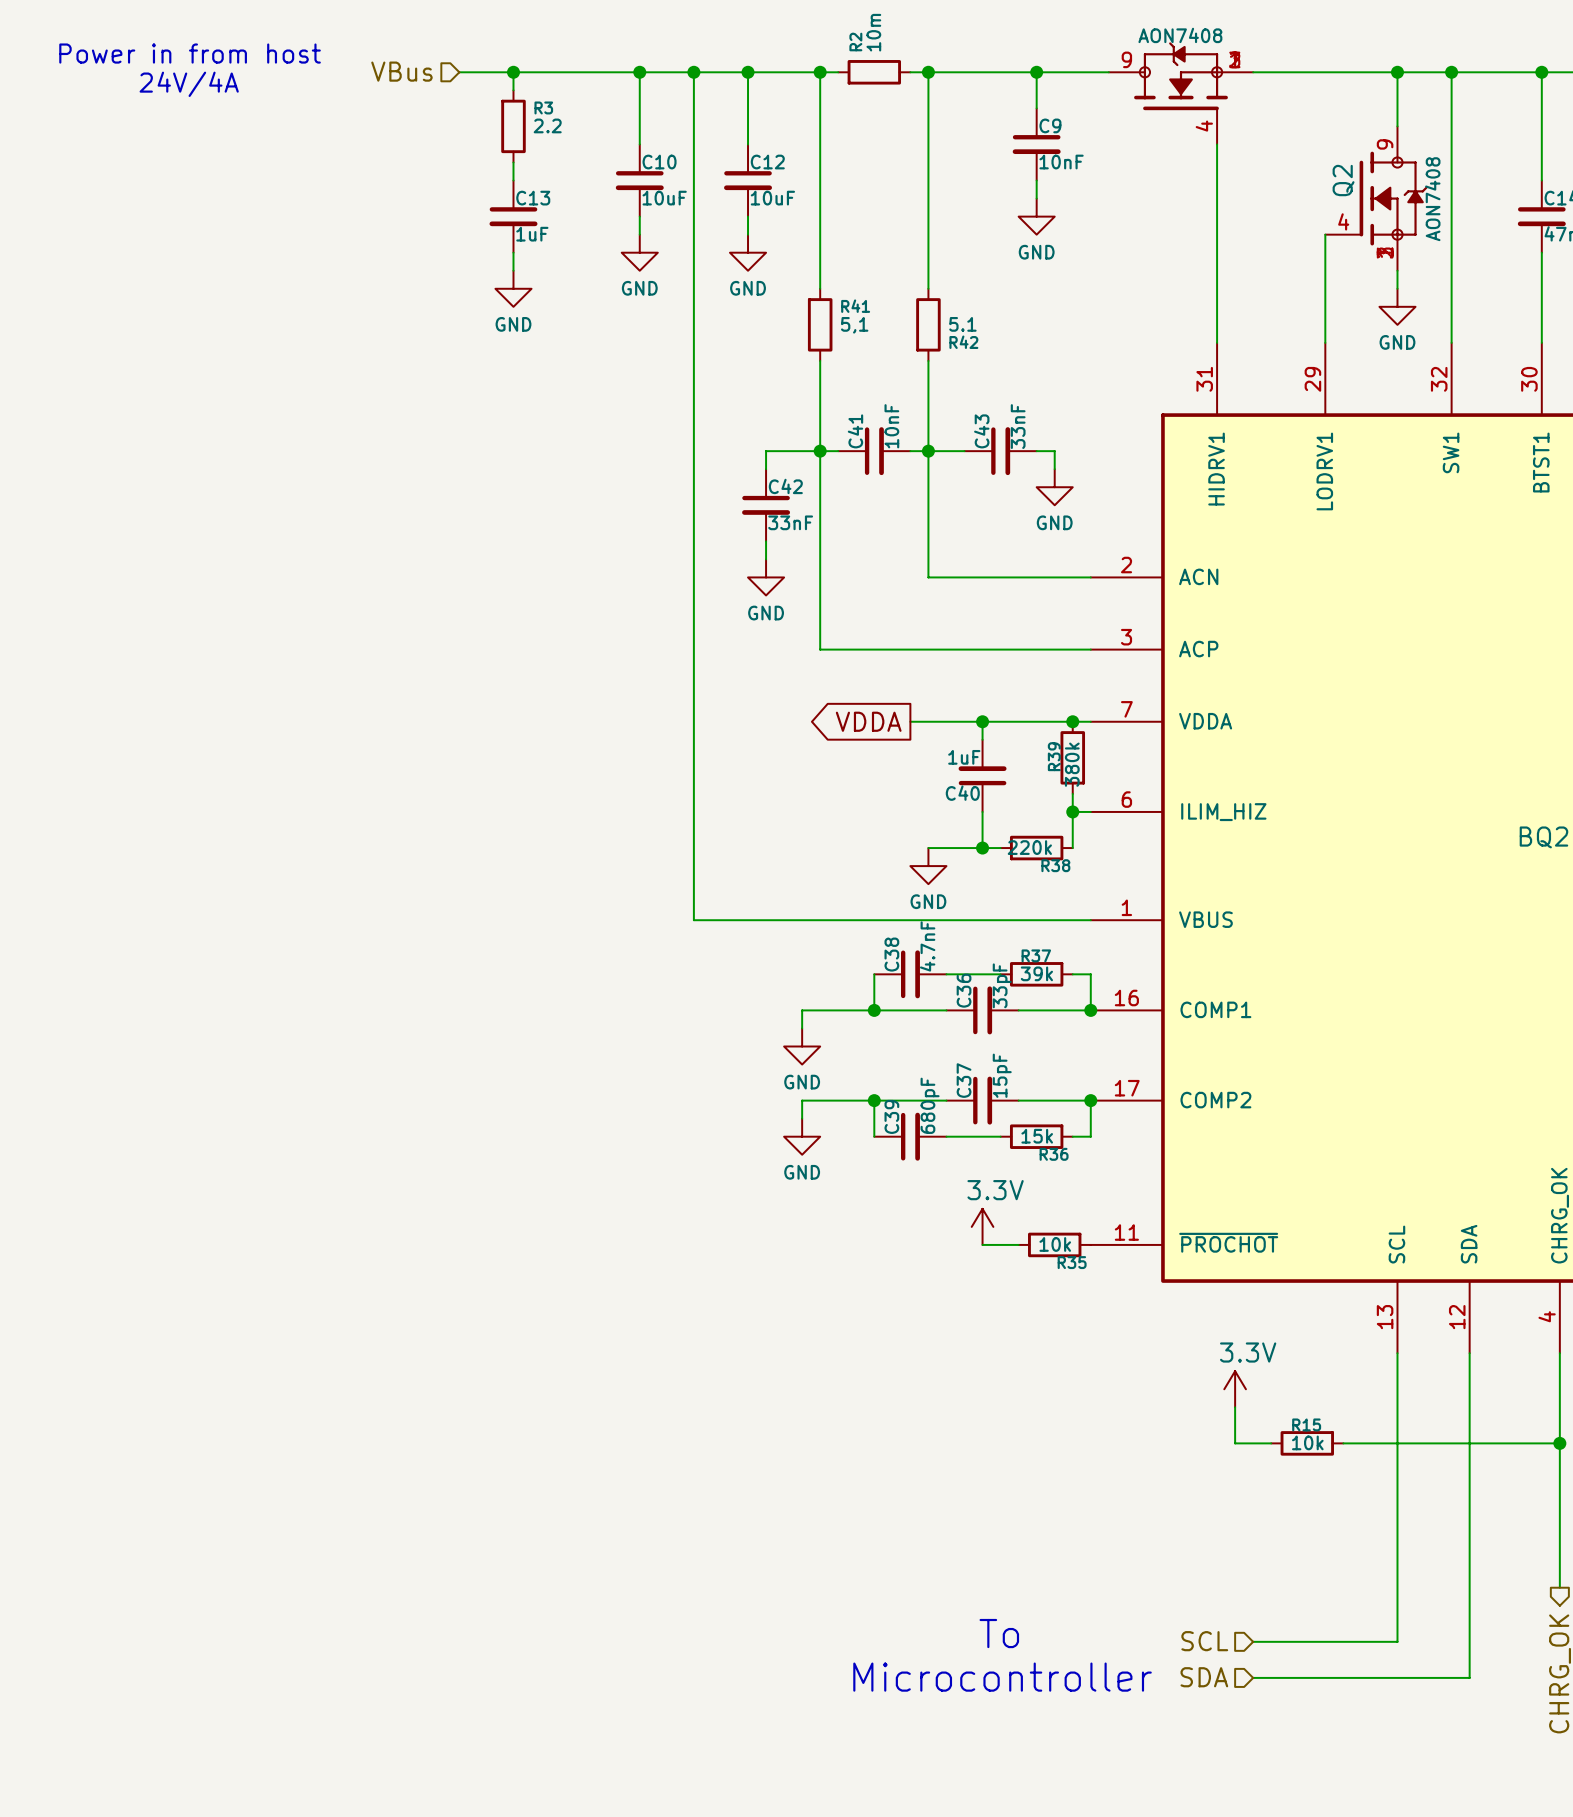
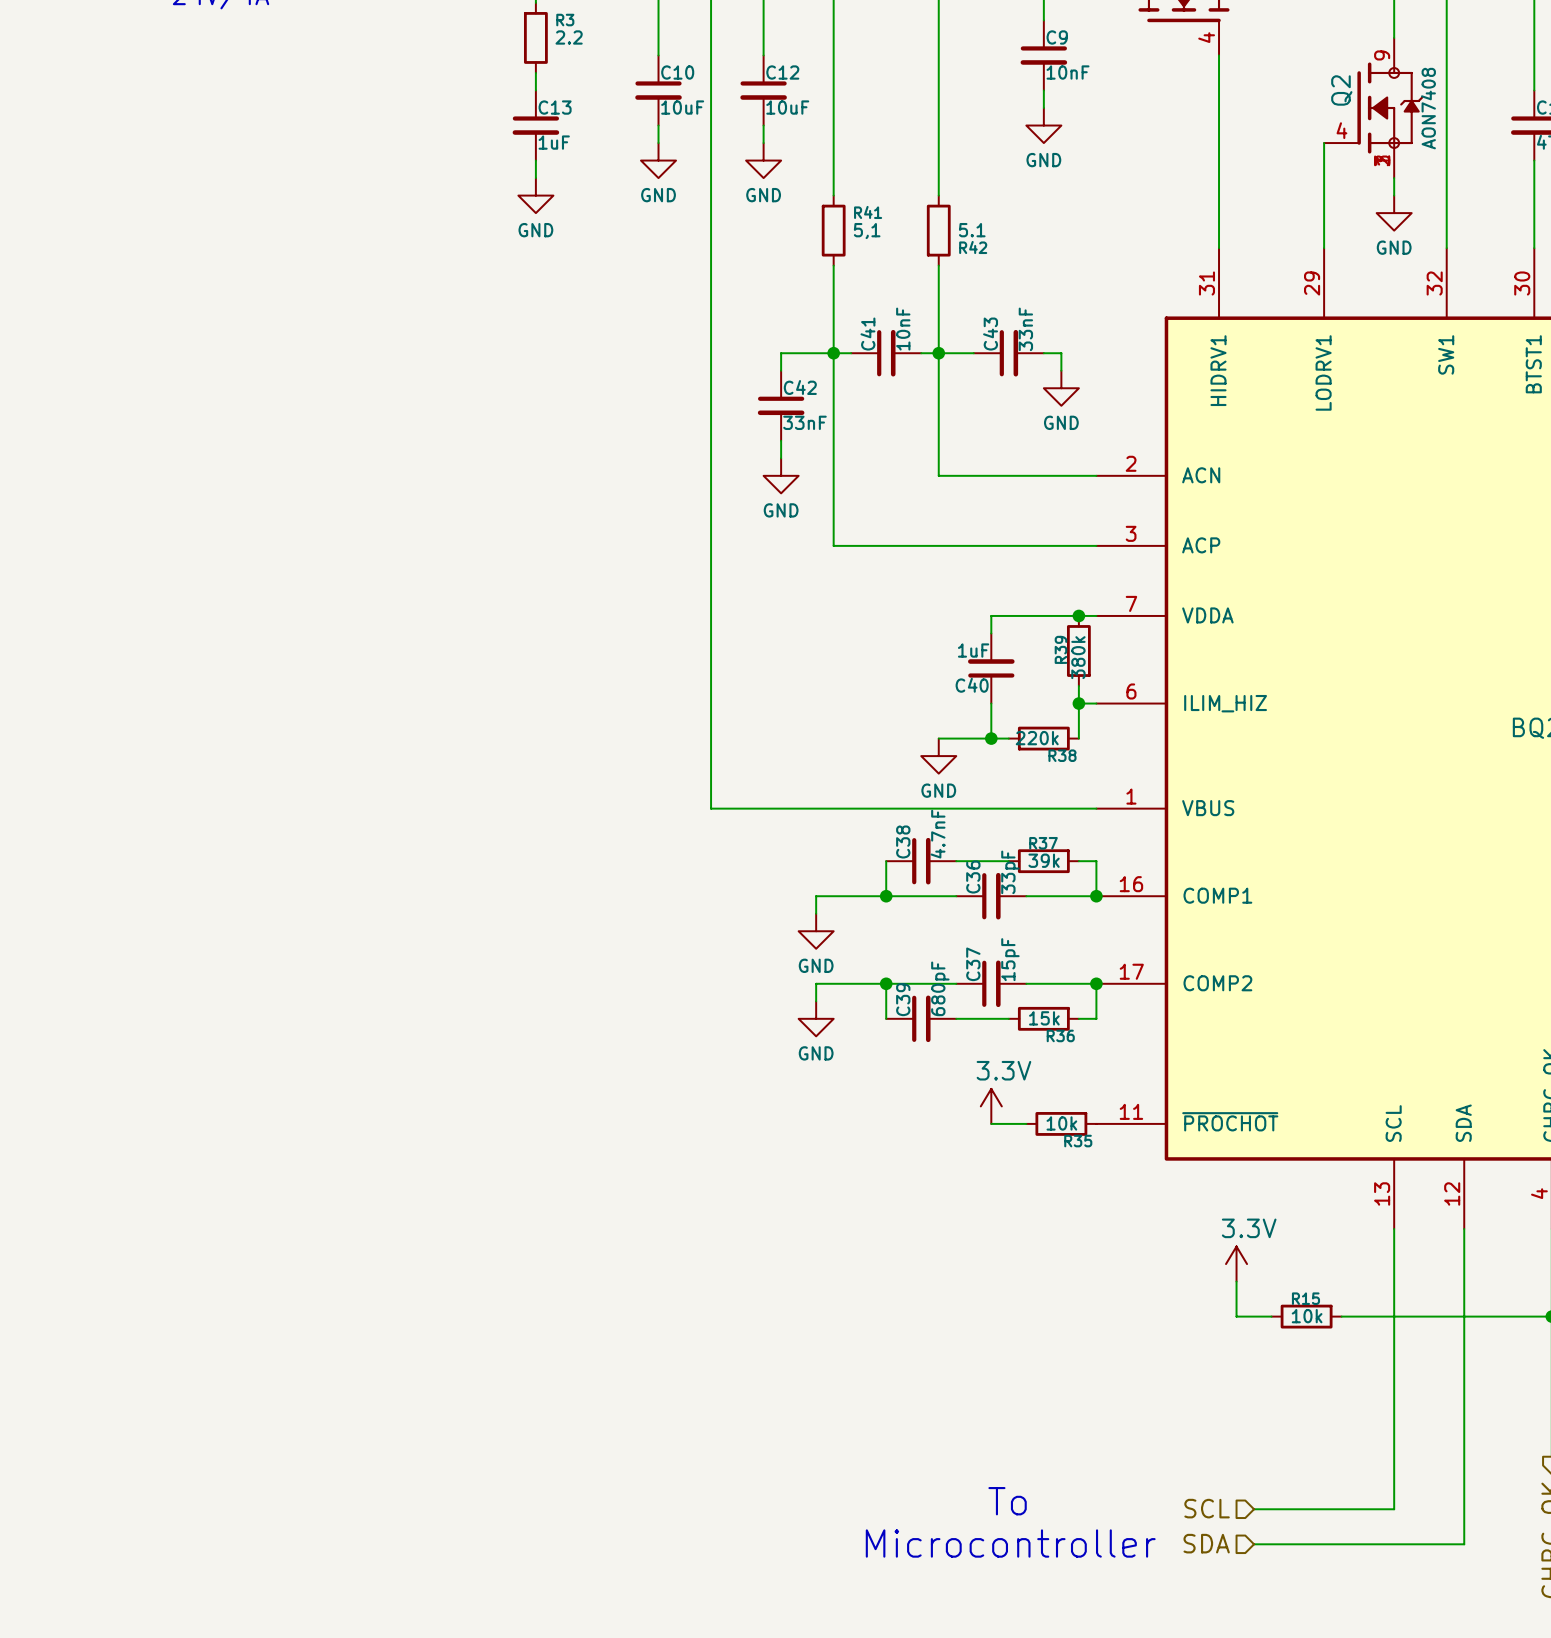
global label: VDDA (868, 721) -> none
wire: (910, 721) (982, 721) -> none
junction: (982, 721) -> none

